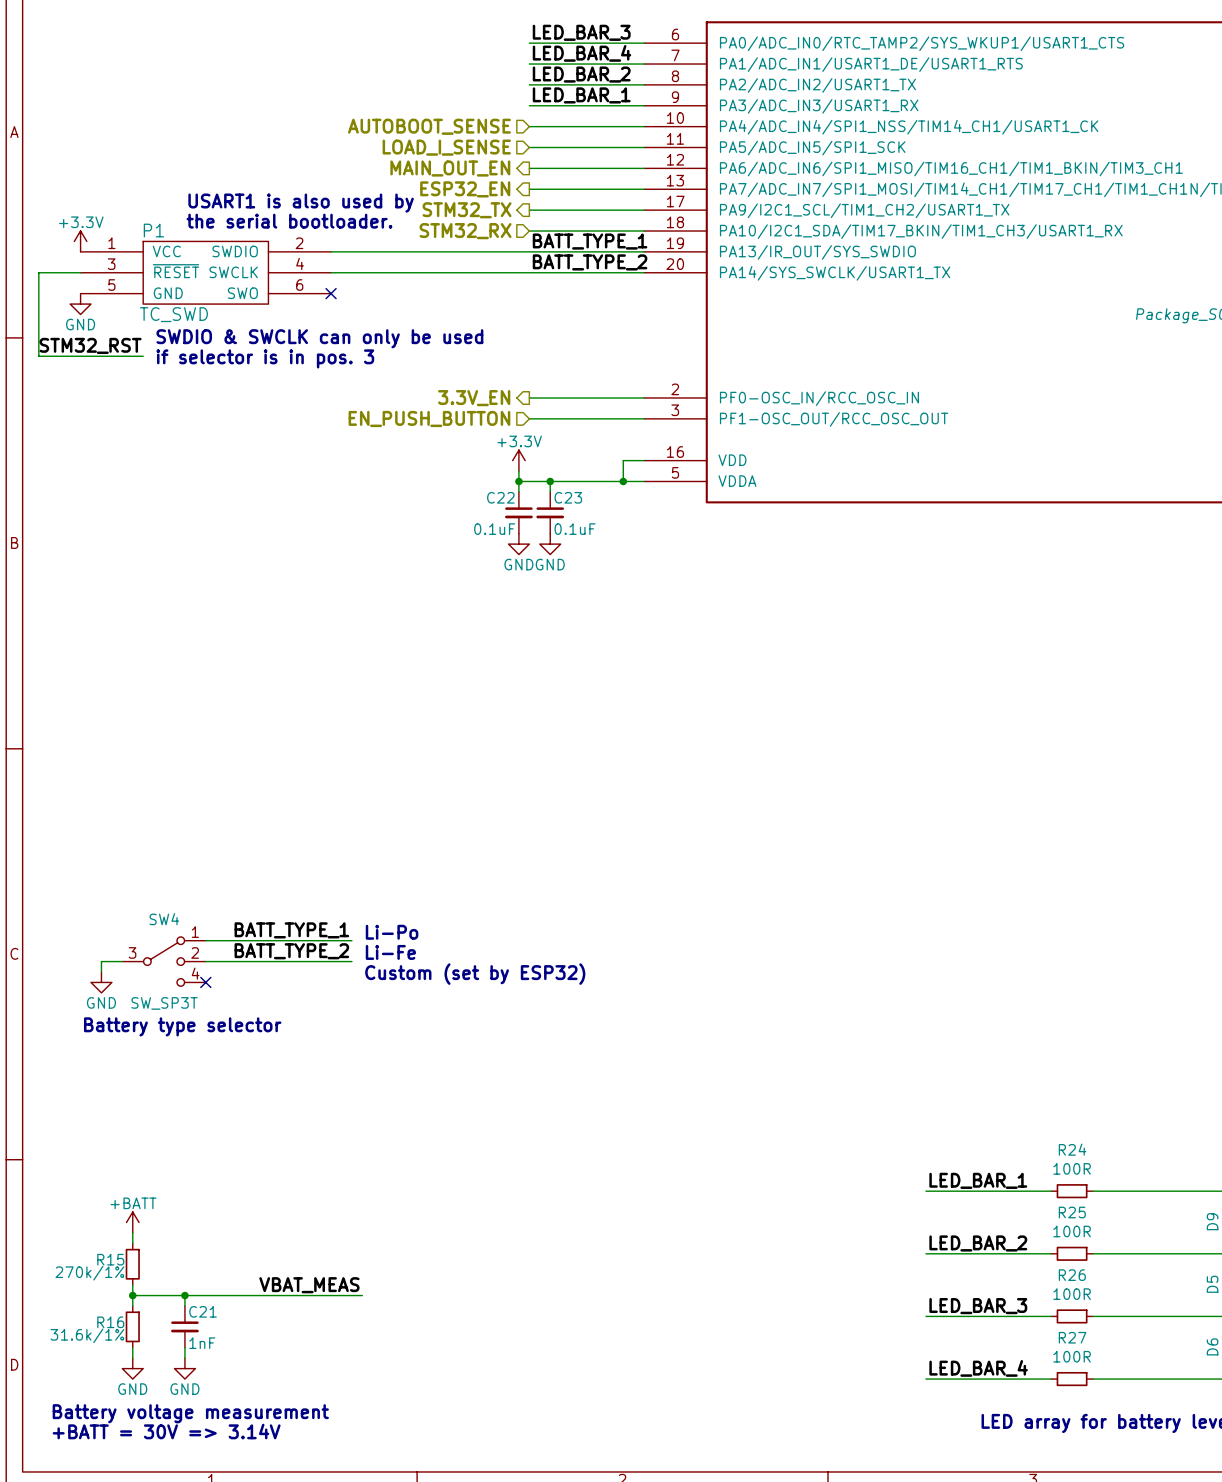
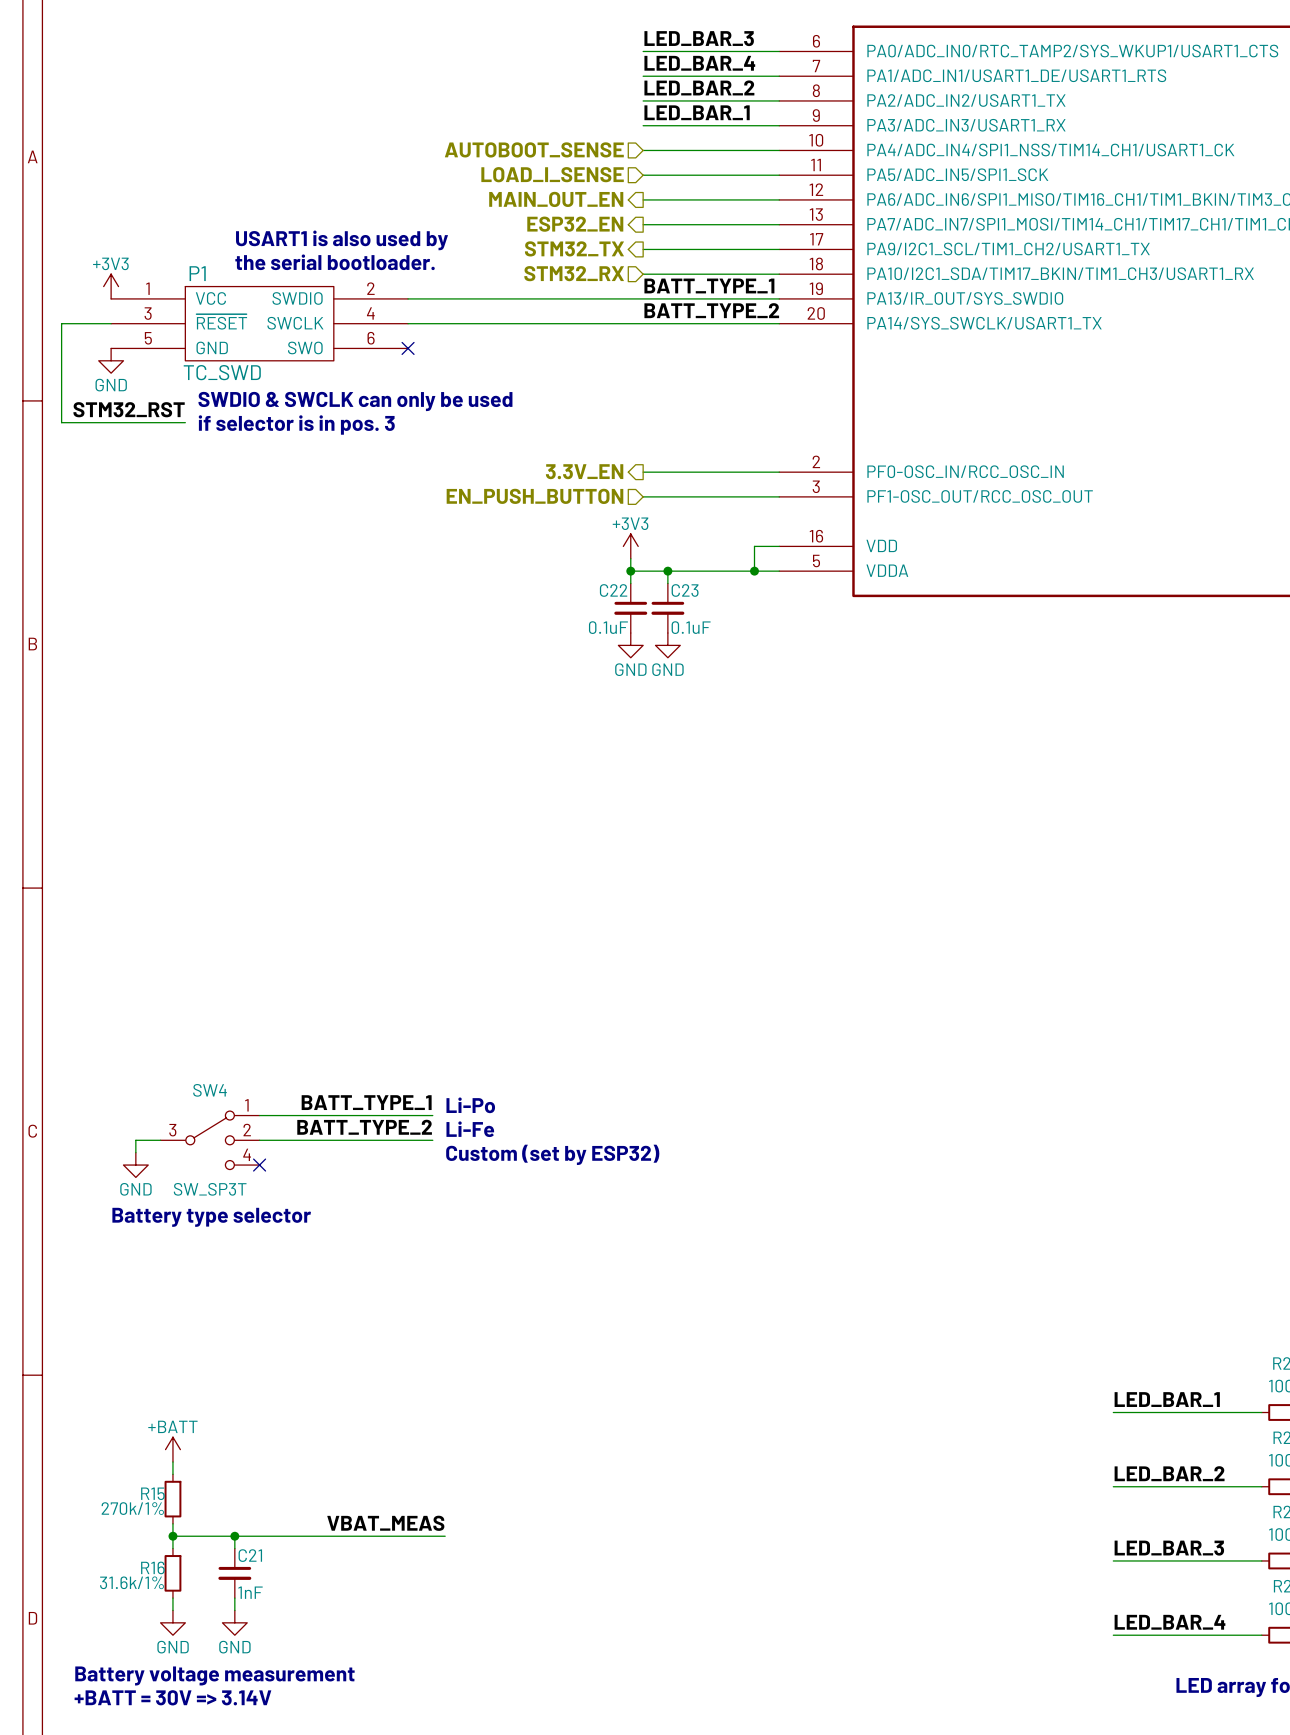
power symbol: +3.3V (80, 241) -> +3V3 (111, 286)
power symbol: +3.3V (518, 460) -> +3V3 (630, 546)

